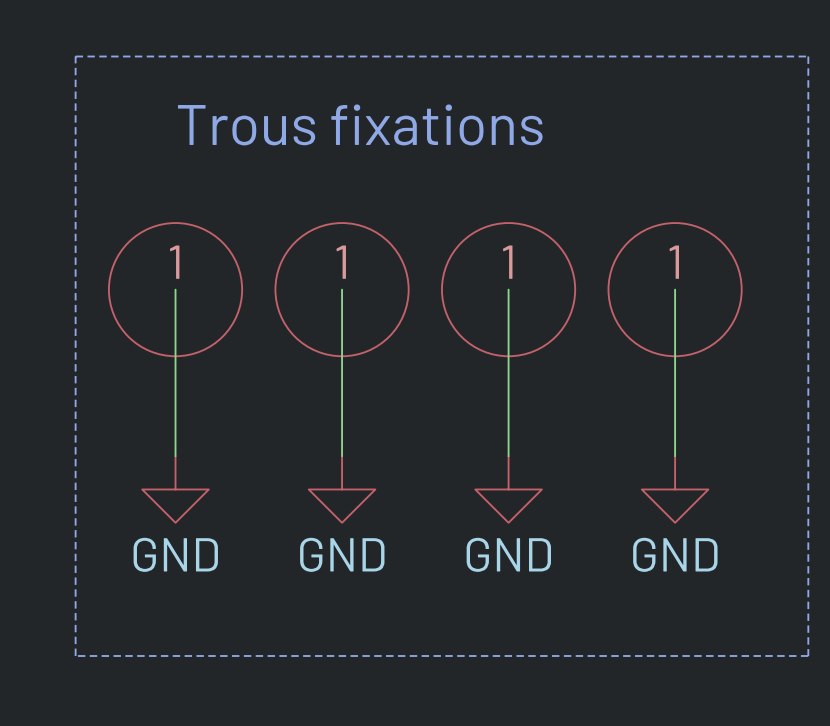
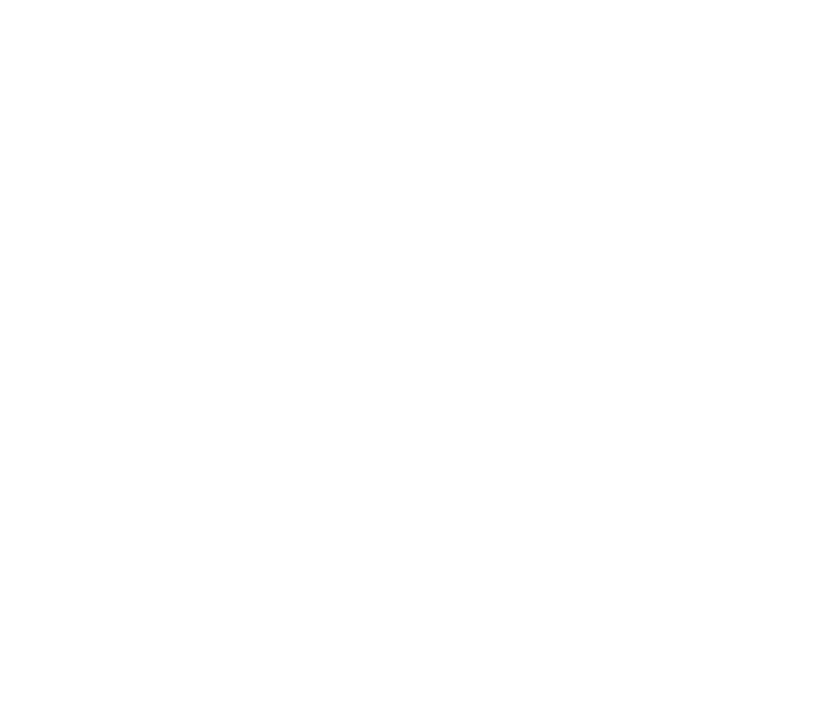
line: (75, 56) (808, 56) (808, 655) (75, 655) (75, 56) -> none
text: Trous fixations (360, 124) -> none
wire: (175, 289) (175, 456) -> none
part: (175, 289) -> none
wire: (342, 289) (342, 456) -> none
part: (342, 289) -> none
wire: (508, 289) (508, 456) -> none
part: (508, 289) -> none
wire: (675, 289) (675, 456) -> none
part: (675, 289) -> none
power symbol: GND (175, 489) -> none
power symbol: GND (342, 489) -> none
power symbol: GND (508, 489) -> none
power symbol: GND (675, 489) -> none

